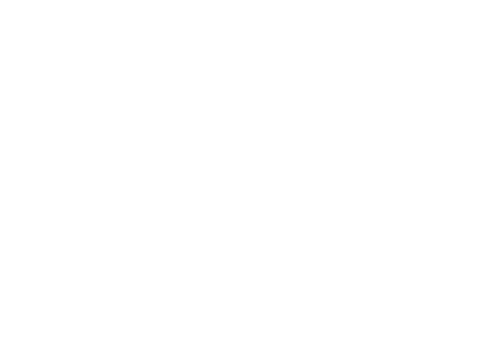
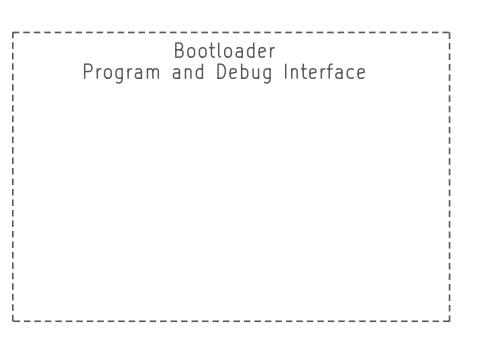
line: none -> (12, 32) (449, 32) (449, 321) (12, 321) (12, 32)
text: none -> Bootloader (225, 50)
text: none -> Program and Debug Interface (224, 73)

